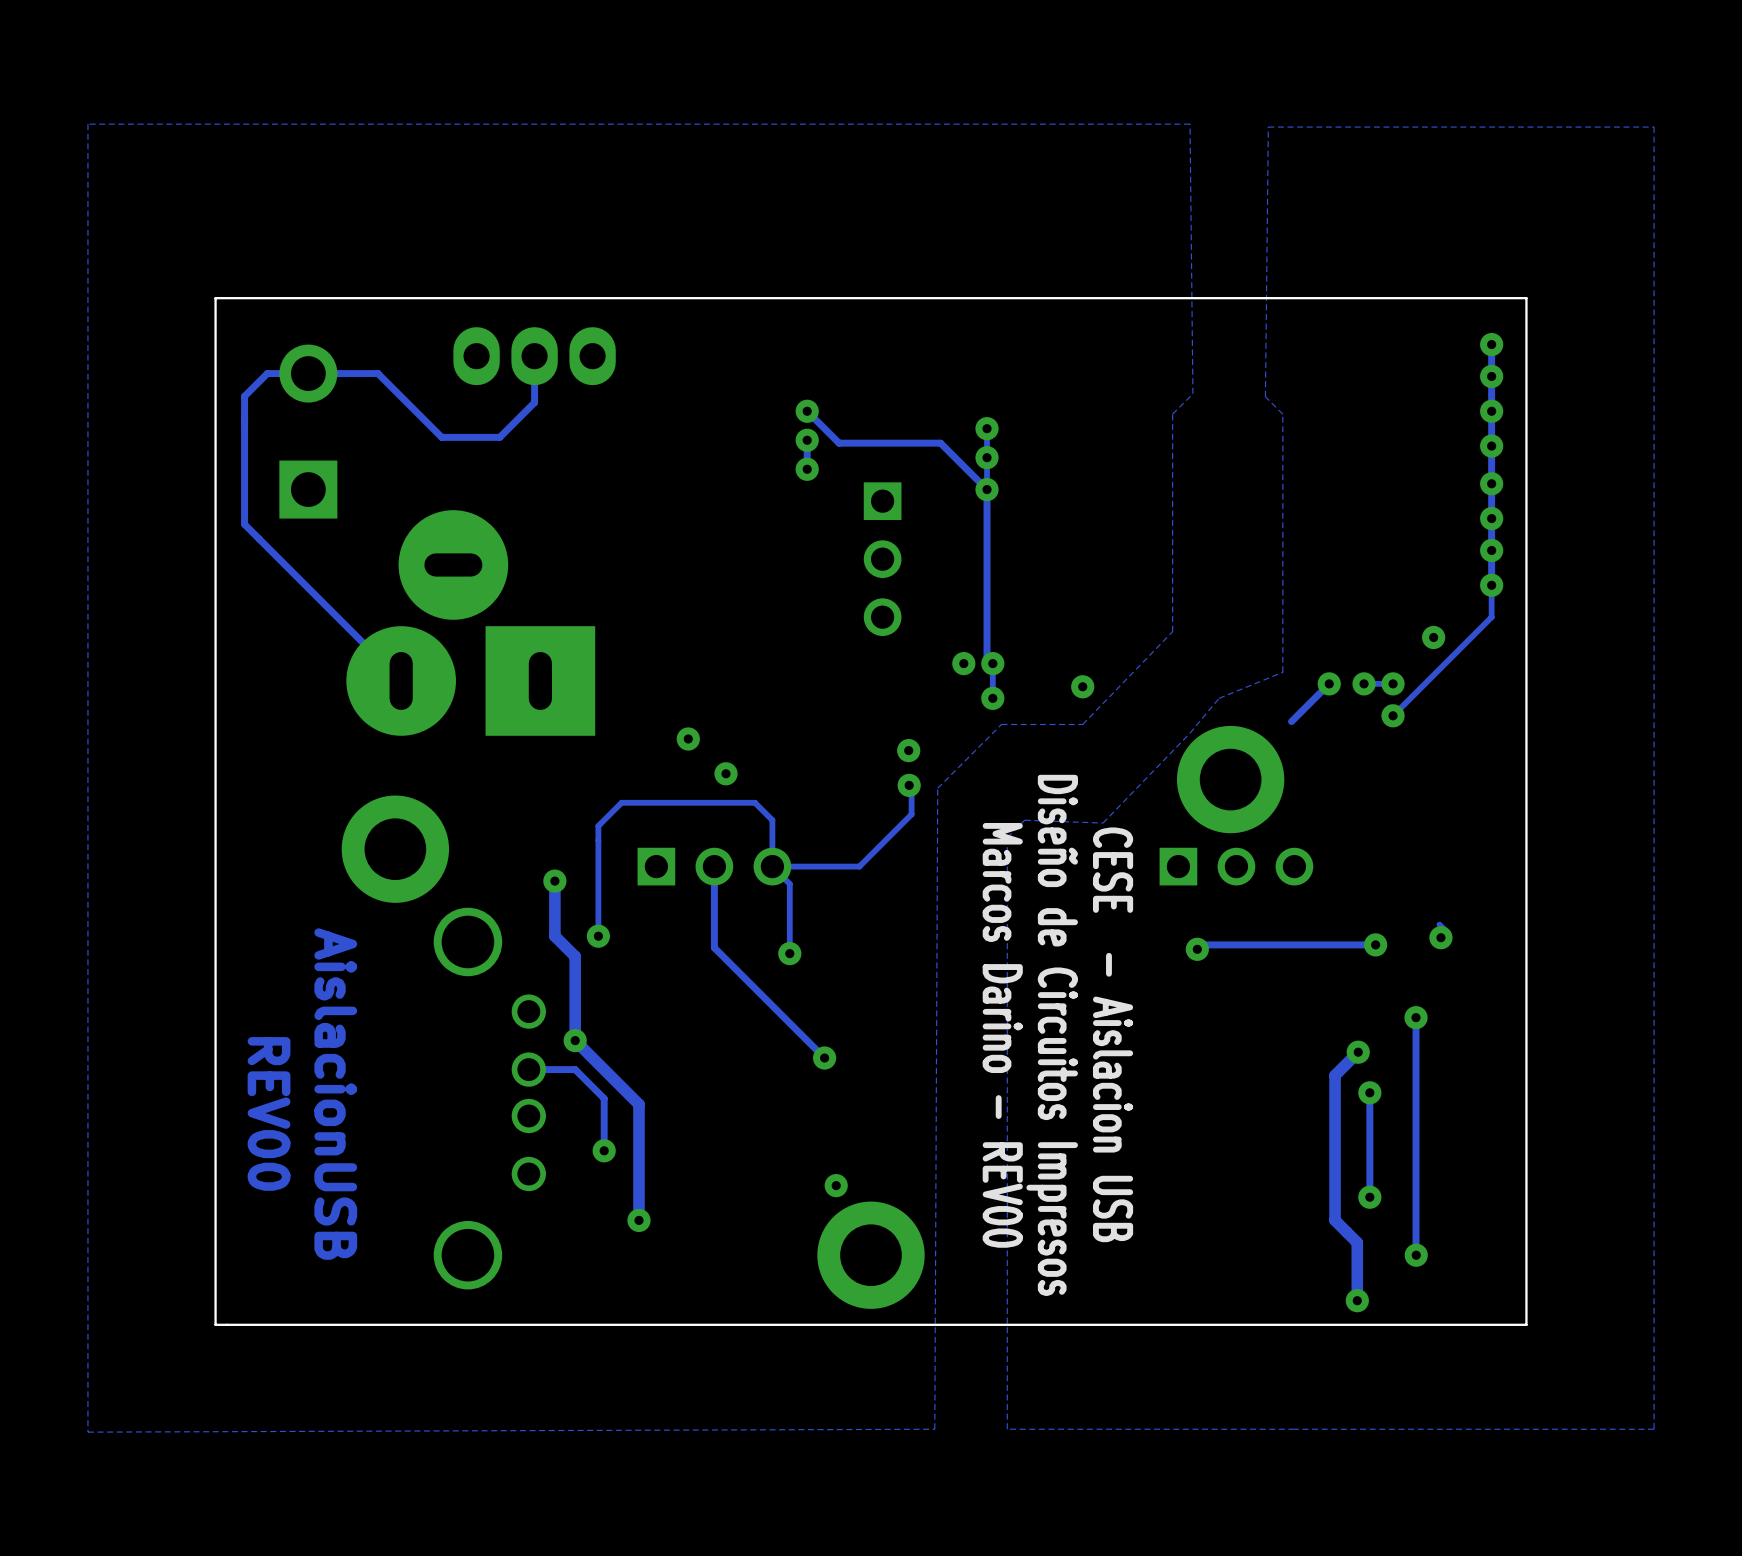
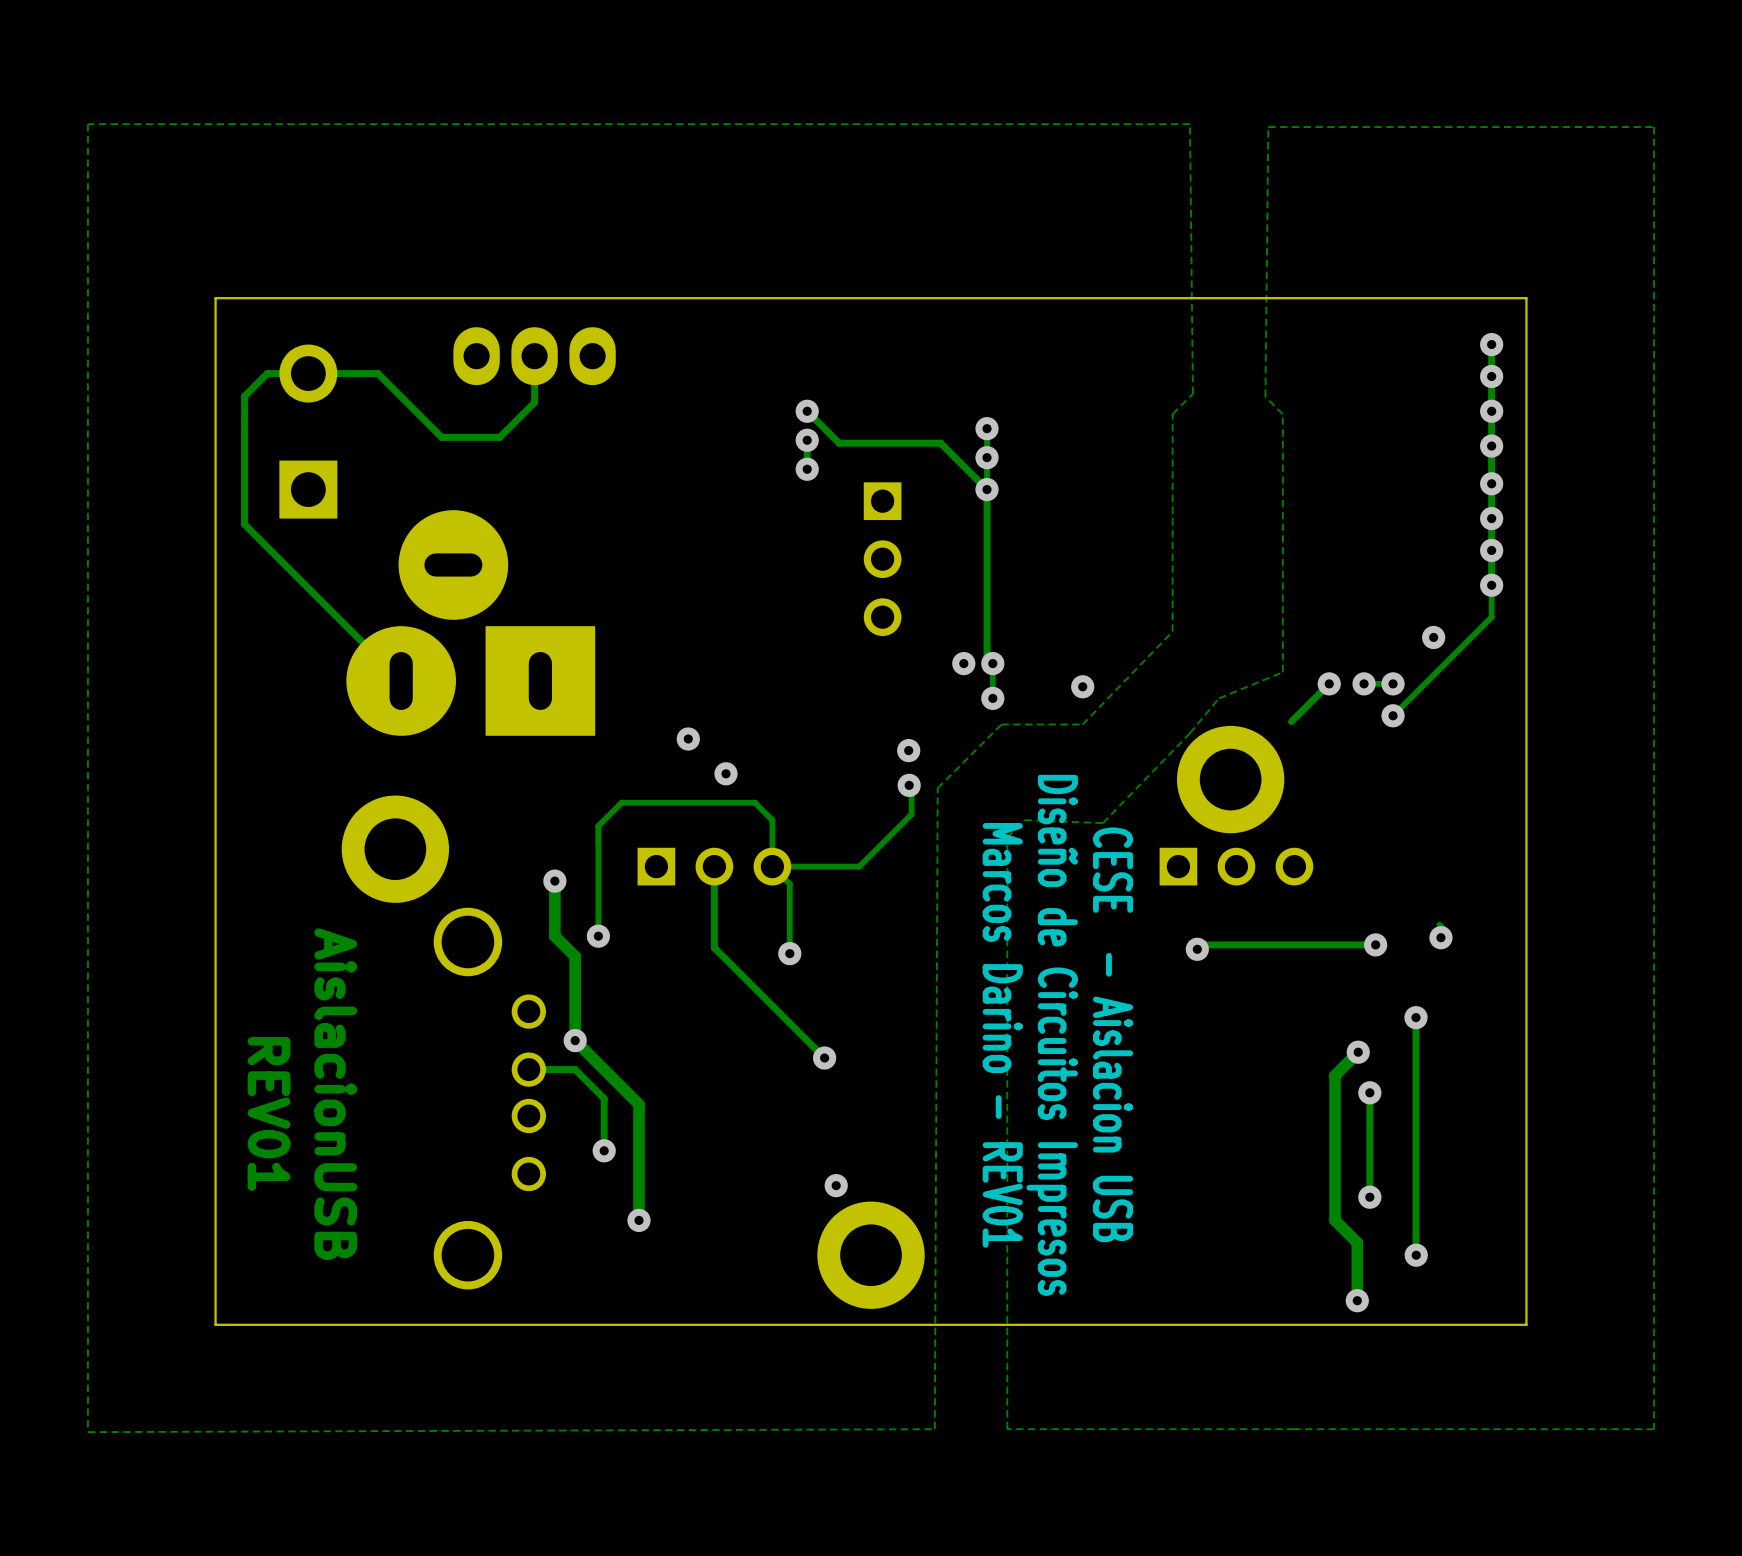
text: Marcos Darino - REV00 (1002, 1035) -> Marcos Darino - REV01 (1002, 1035)
text: REV00 (269, 1113) -> REV01 (269, 1113)

